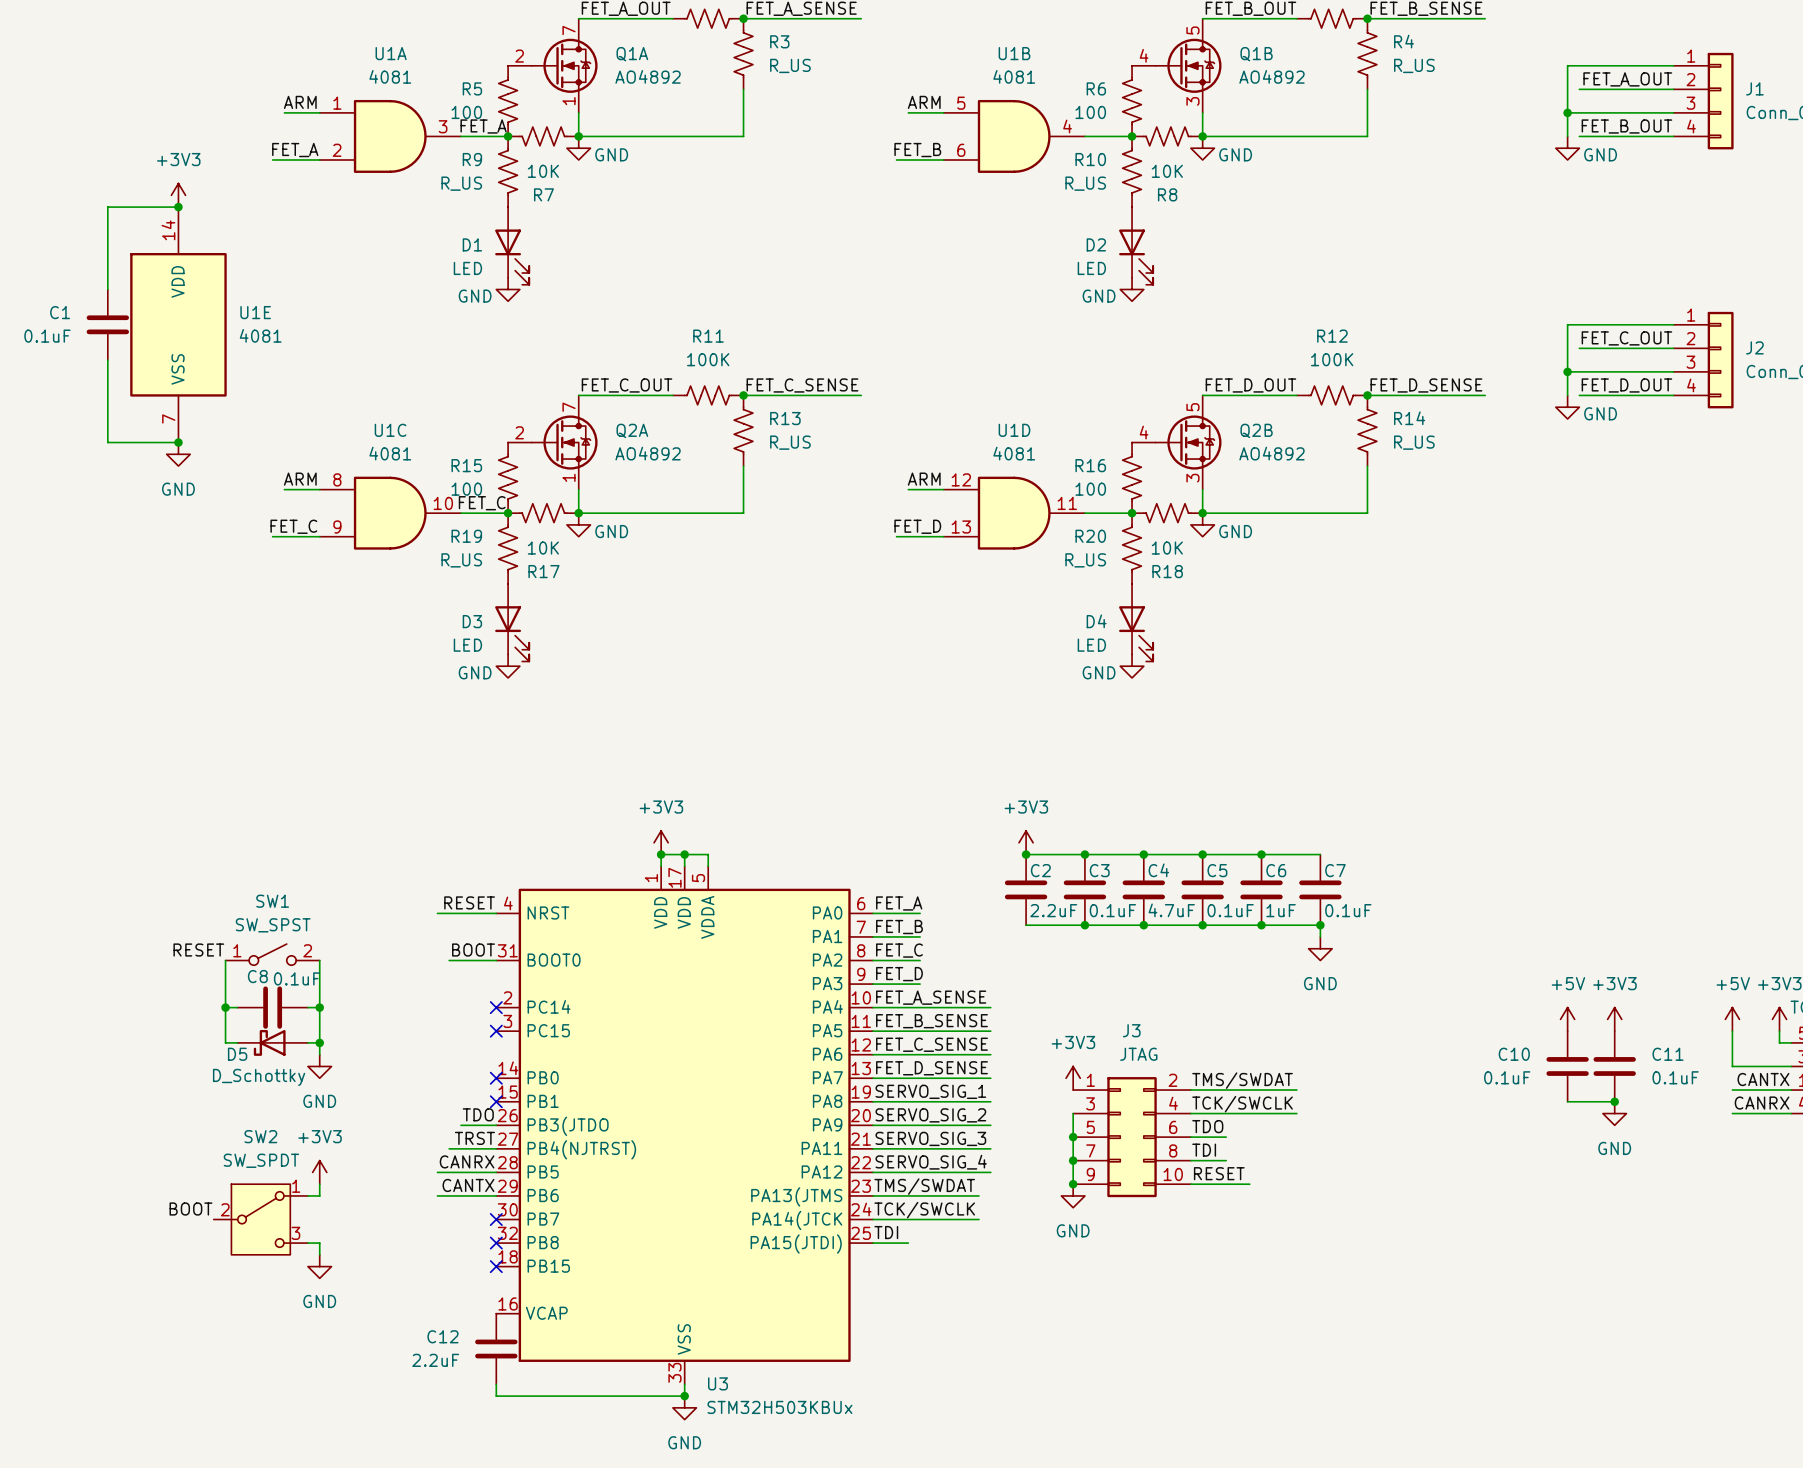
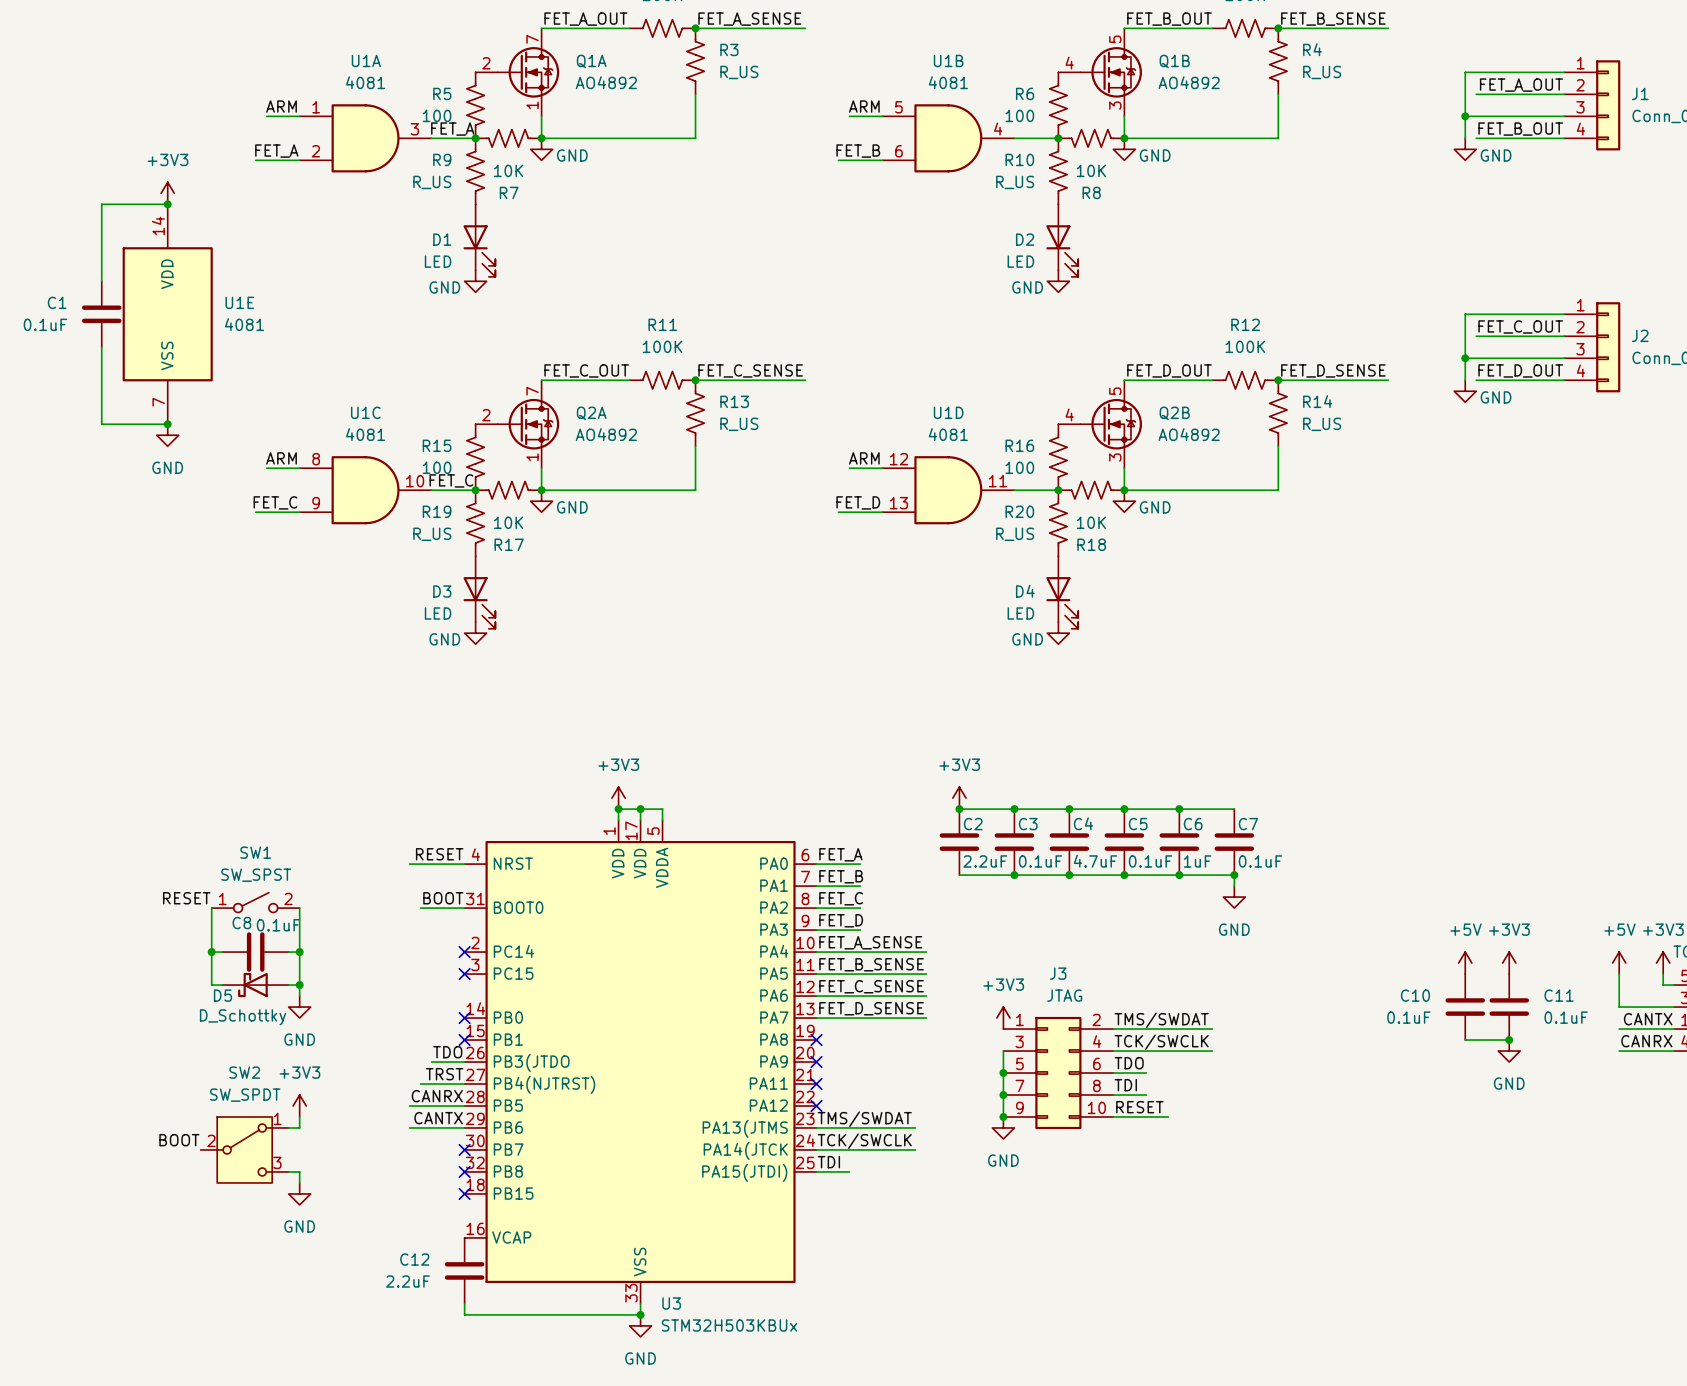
label: SERVO_SIG_1 (930, 1091) -> none
wire: (873, 1101) (990, 1101) -> none
no-connect mark: none -> (816, 1040)
label: SERVO_SIG_2 (930, 1115) -> none
wire: (873, 1125) (990, 1125) -> none
no-connect mark: none -> (816, 1062)
label: SERVO_SIG_3 (930, 1138) -> none
wire: (873, 1148) (990, 1148) -> none
no-connect mark: none -> (816, 1084)
label: SERVO_SIG_4 (931, 1162) -> none
wire: (873, 1172) (990, 1172) -> none
no-connect mark: none -> (816, 1105)

